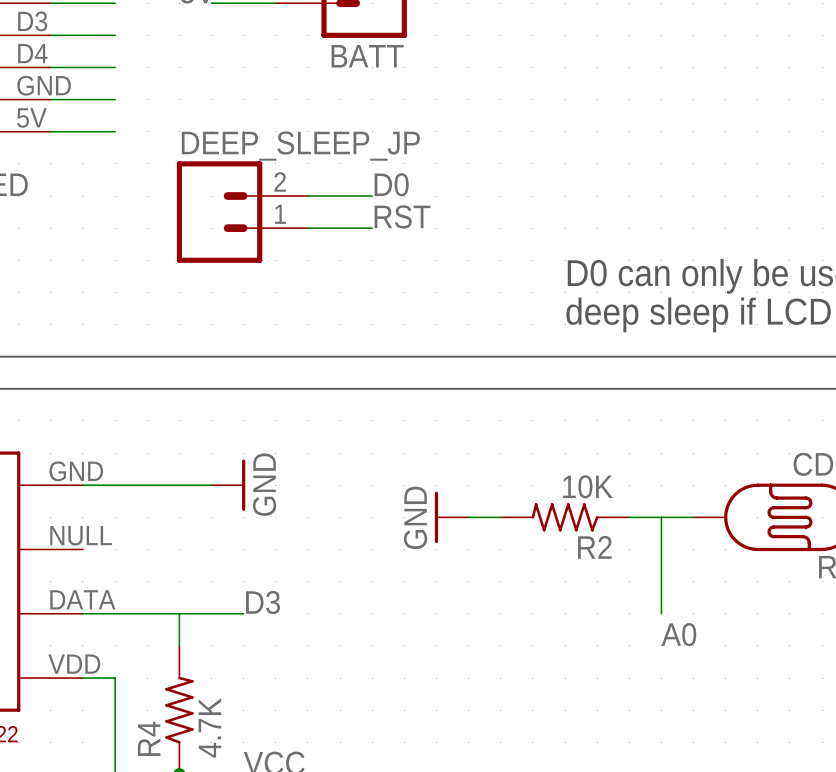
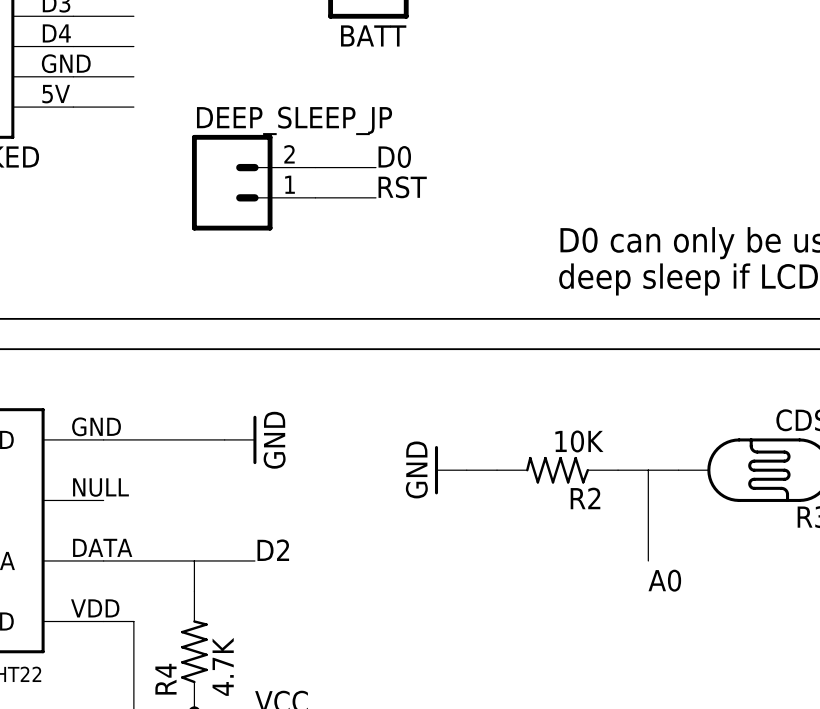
label: D3 (263, 602) -> D2 (273, 550)

